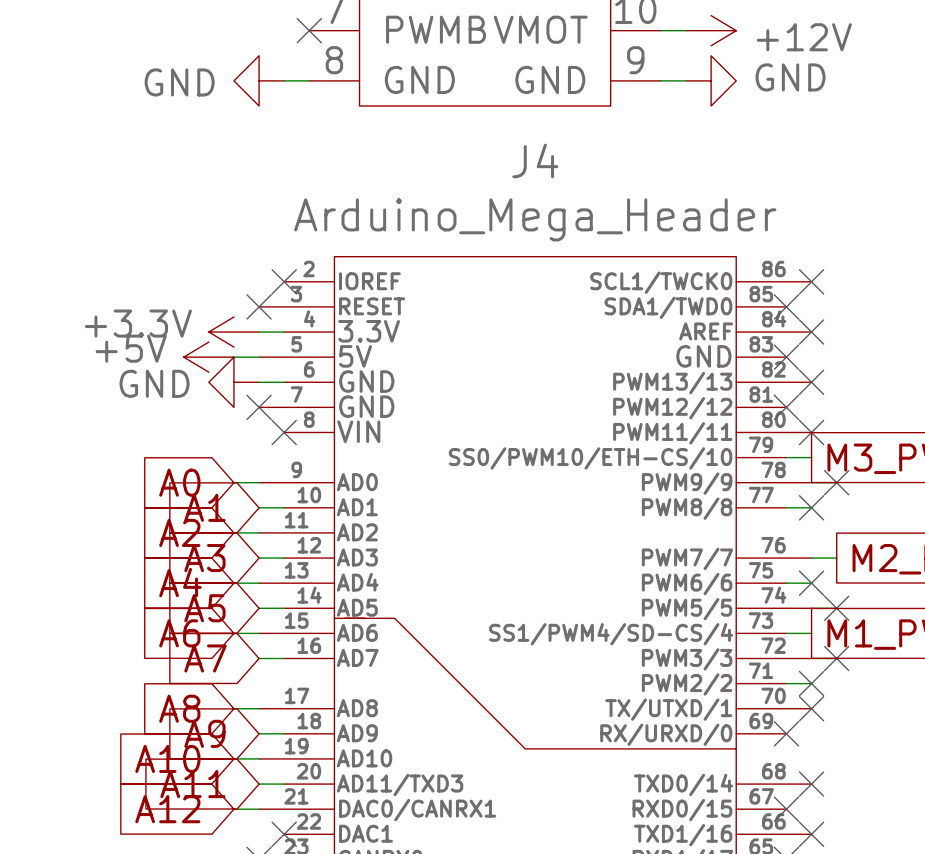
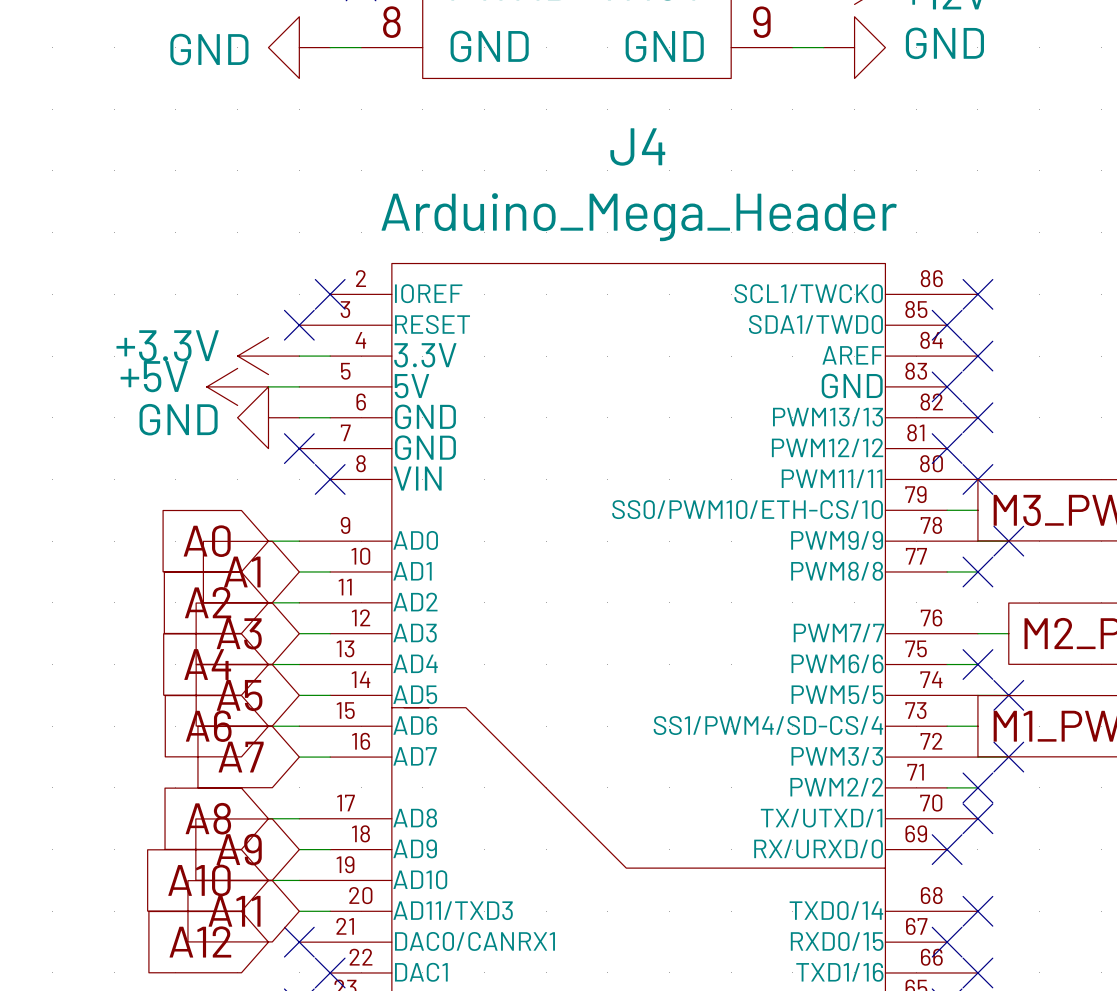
wire: (233, 809) (259, 809) -> none
no-connect mark: none -> (299, 942)

